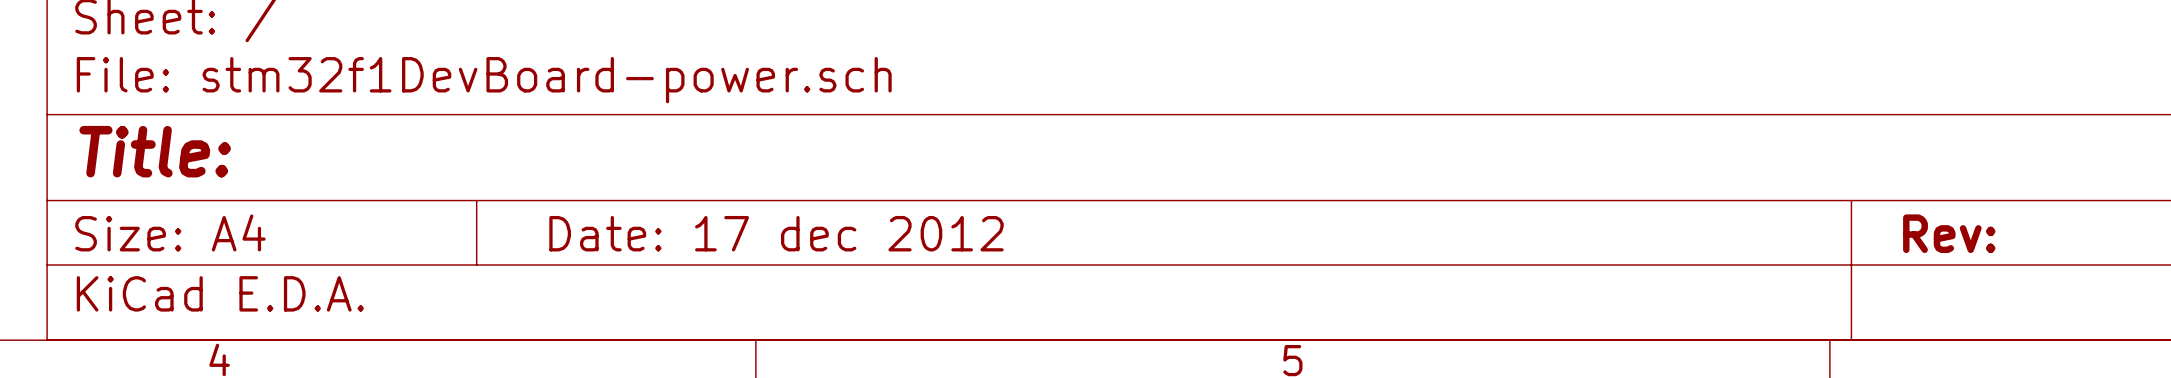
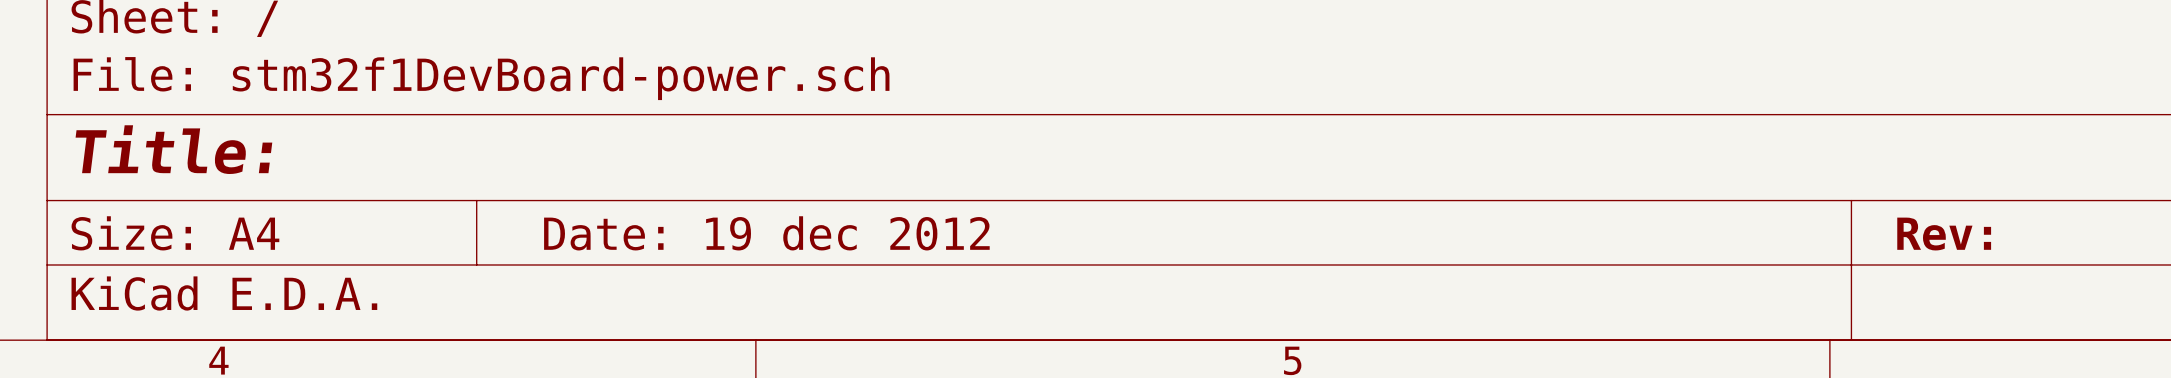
title block: Date: 17 dec 2012 (776, 233) -> Date: 19 dec 2012 (766, 233)

